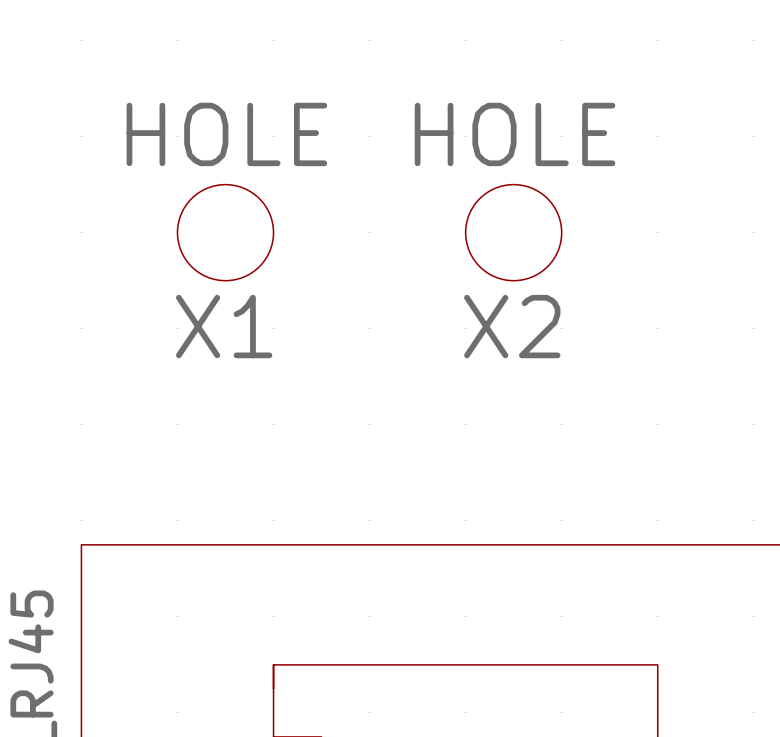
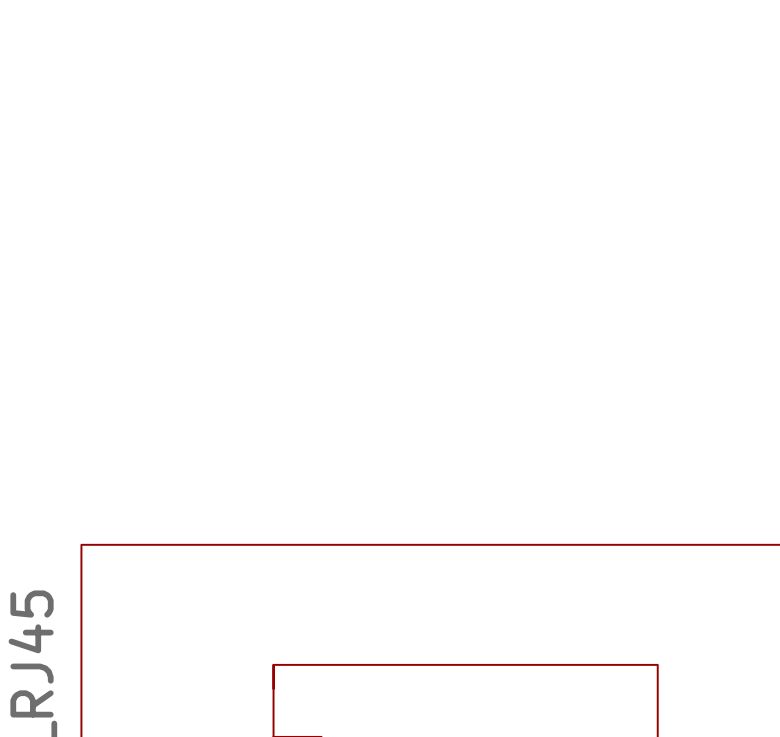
X1: HOLE (225, 232) -> none
X2: HOLE (513, 232) -> none

